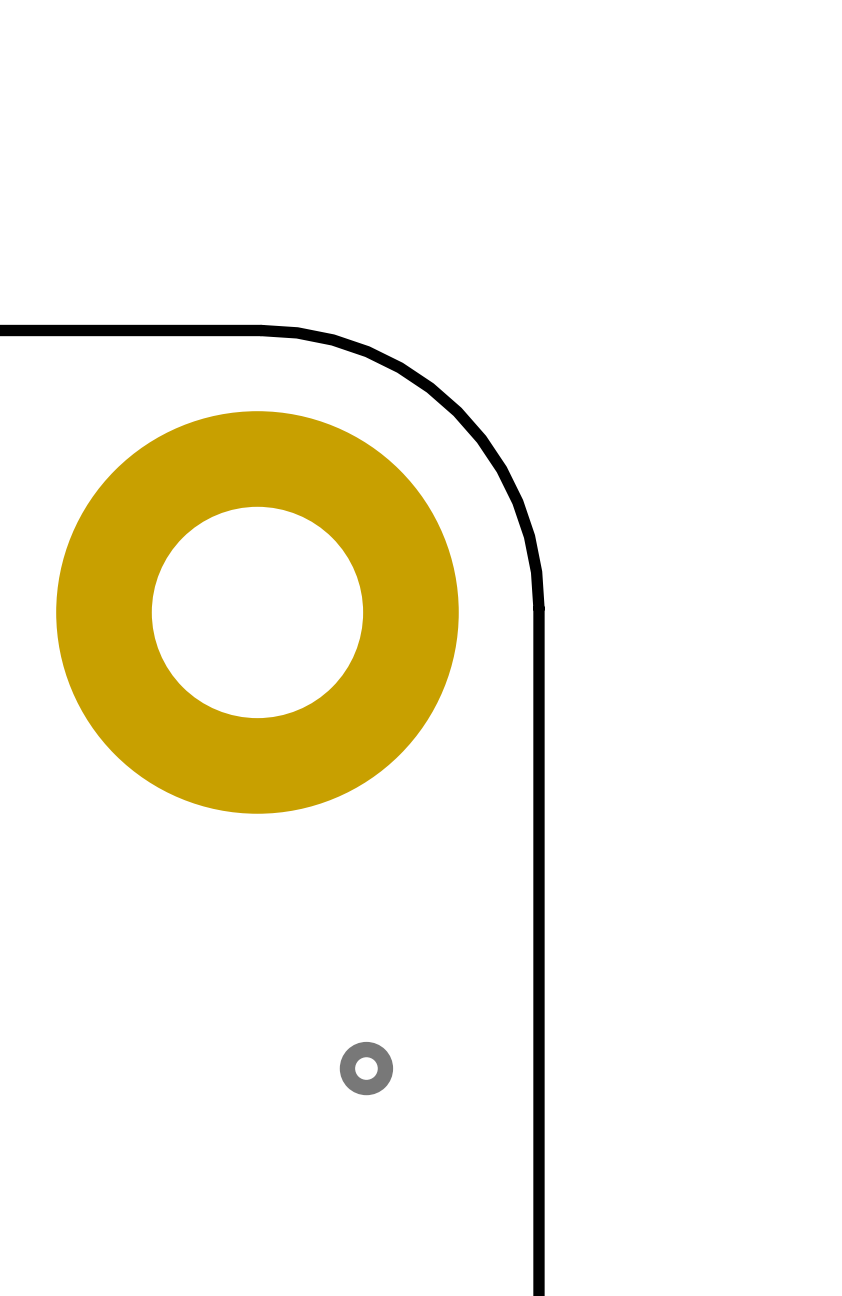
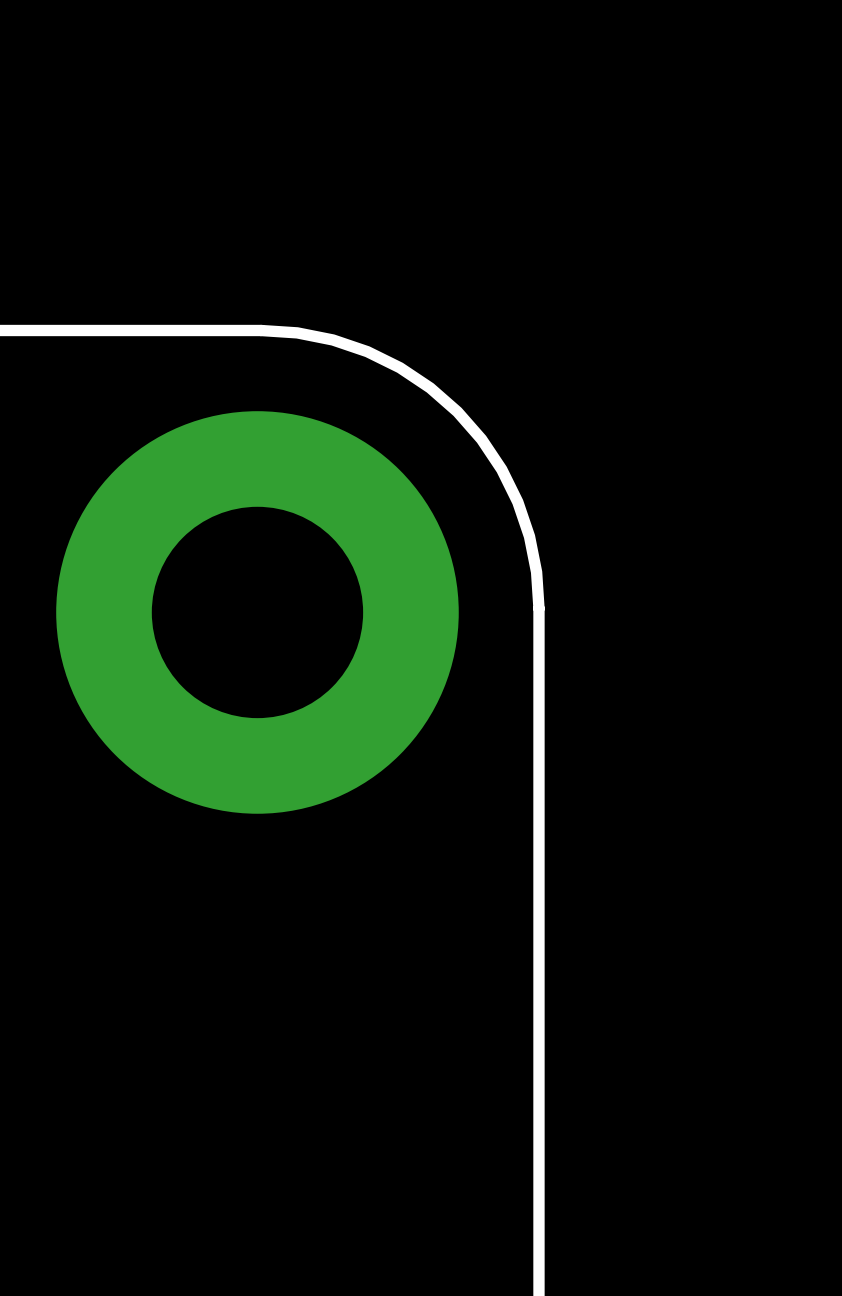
via: (366, 1068) -> none

